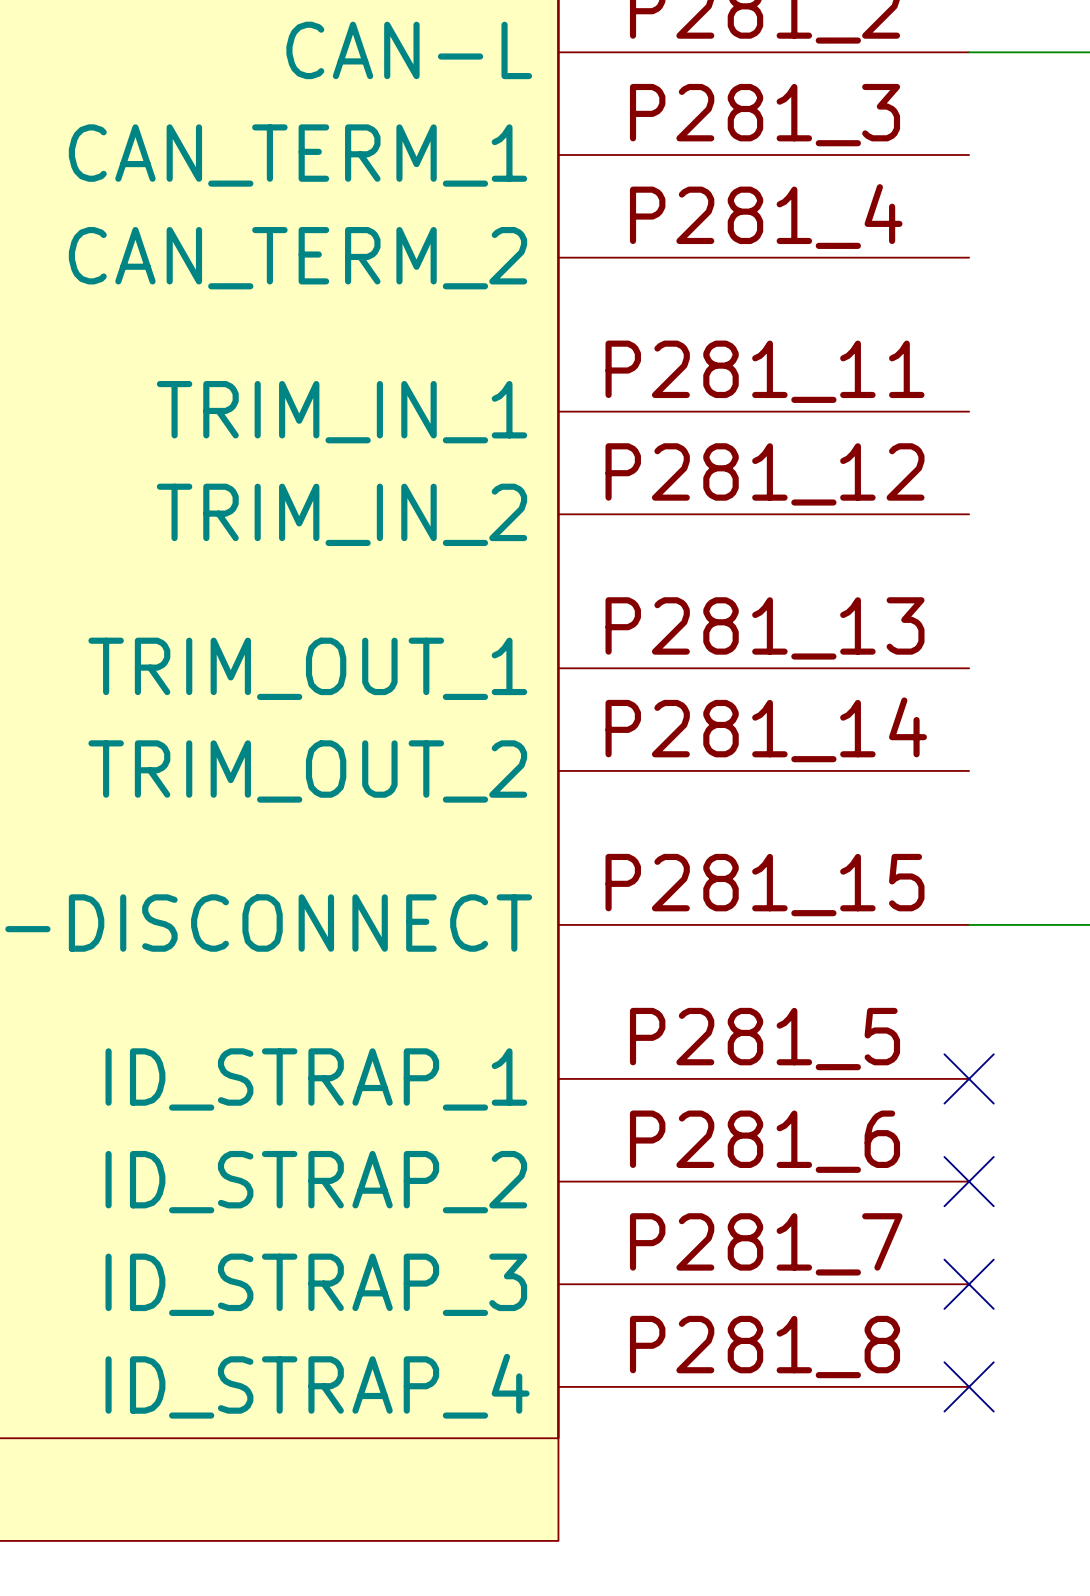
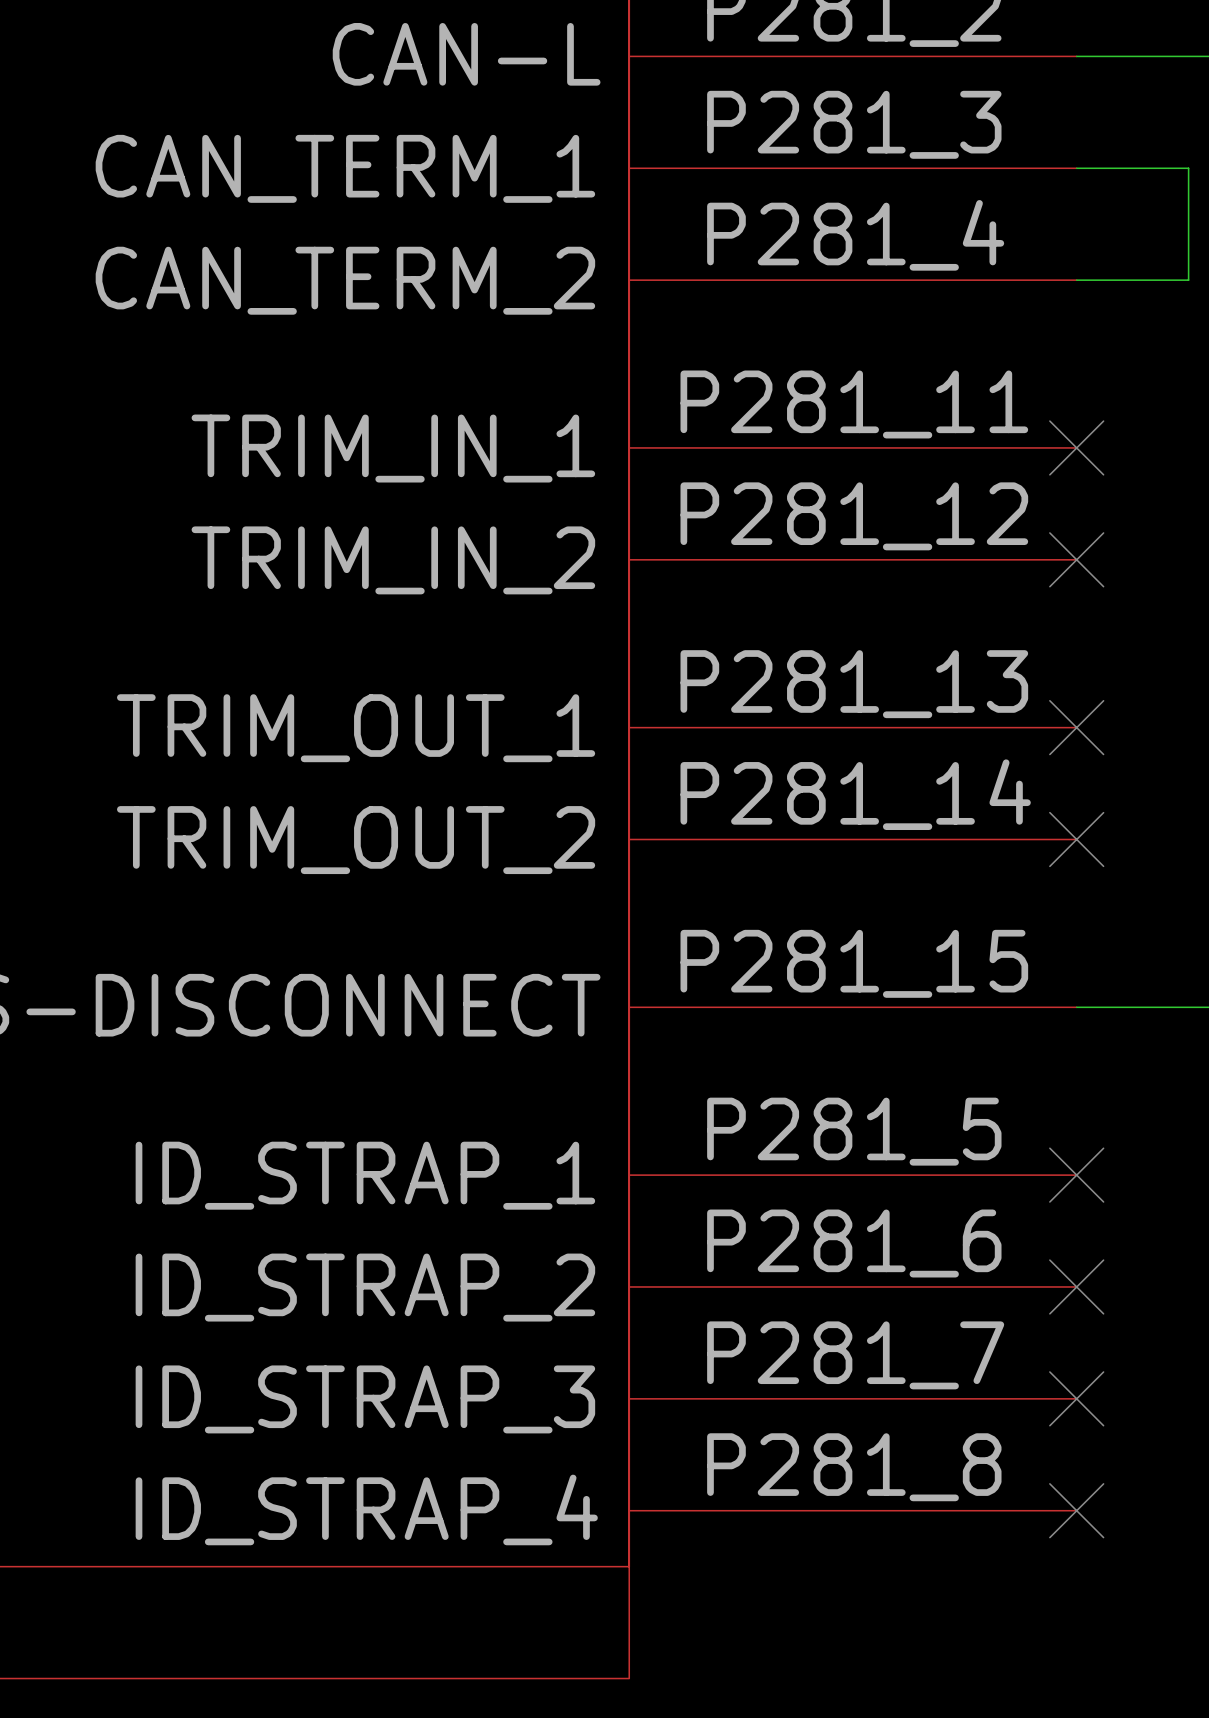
wire: none -> (1076, 168) (1188, 168) (1188, 280) (1076, 280)
no-connect mark: none -> (1076, 447)
no-connect mark: none -> (1076, 559)
no-connect mark: none -> (1076, 727)
no-connect mark: none -> (1076, 839)

